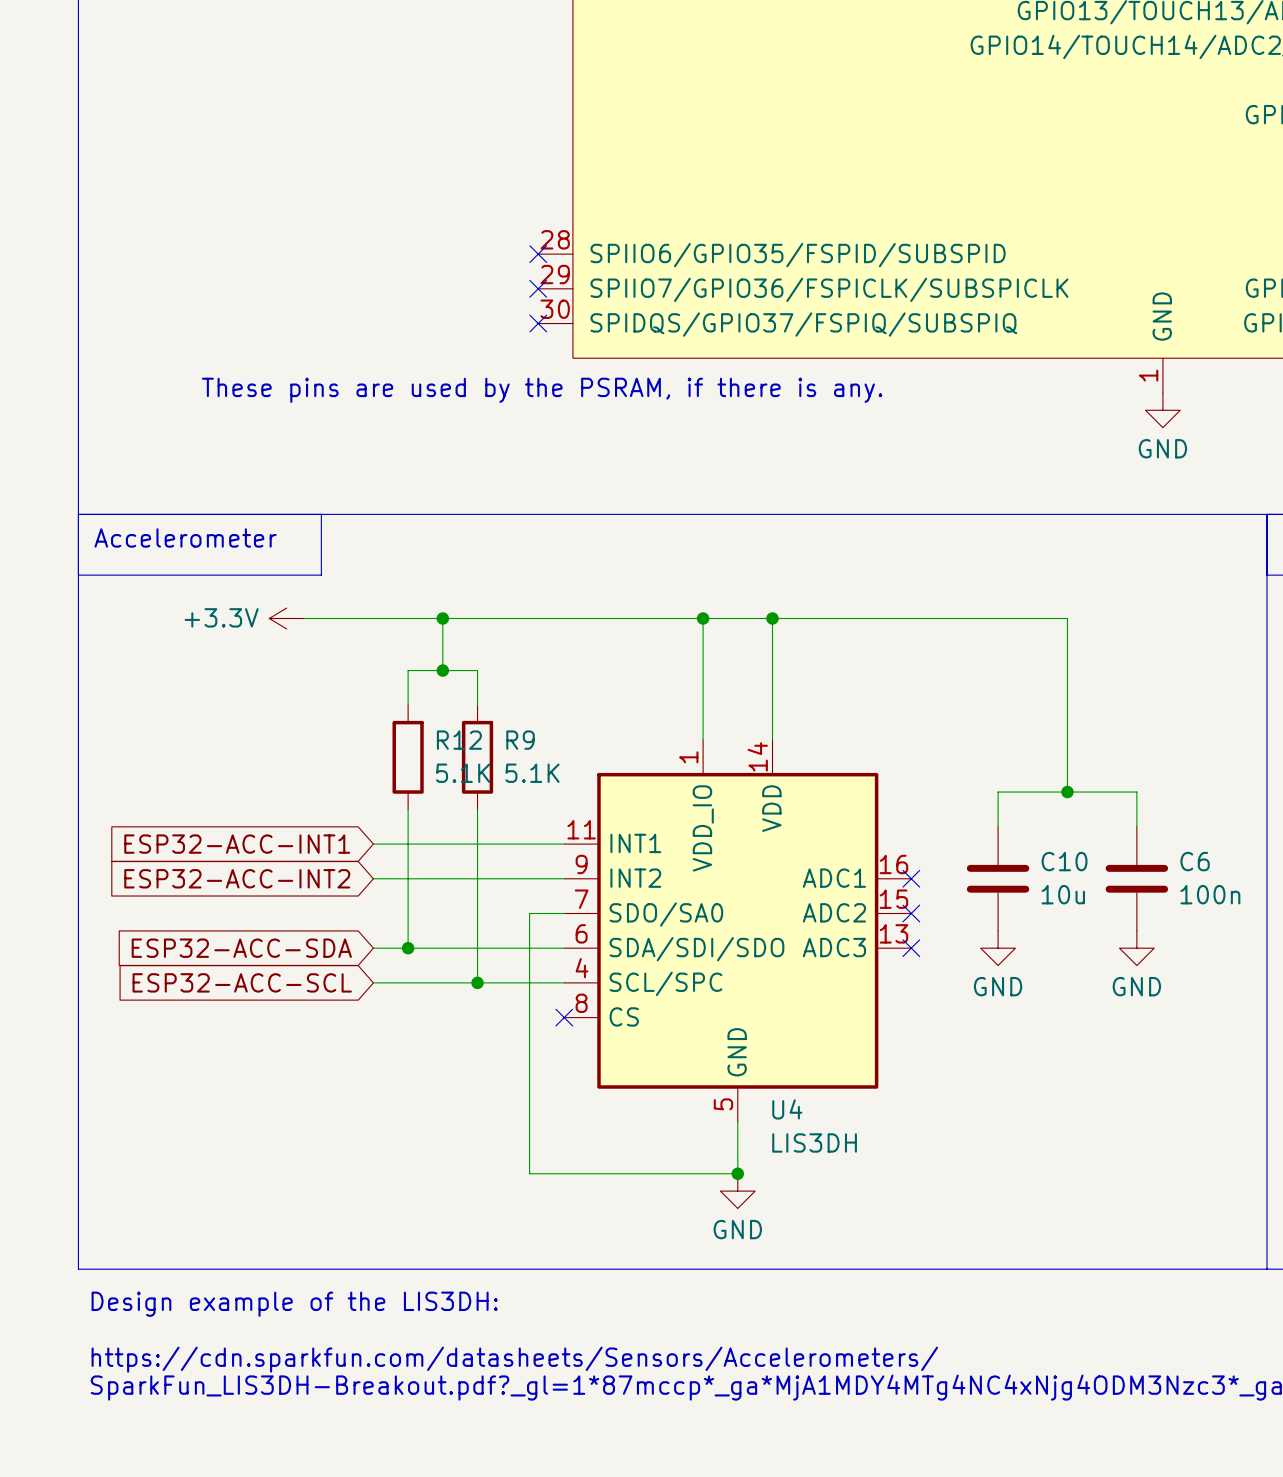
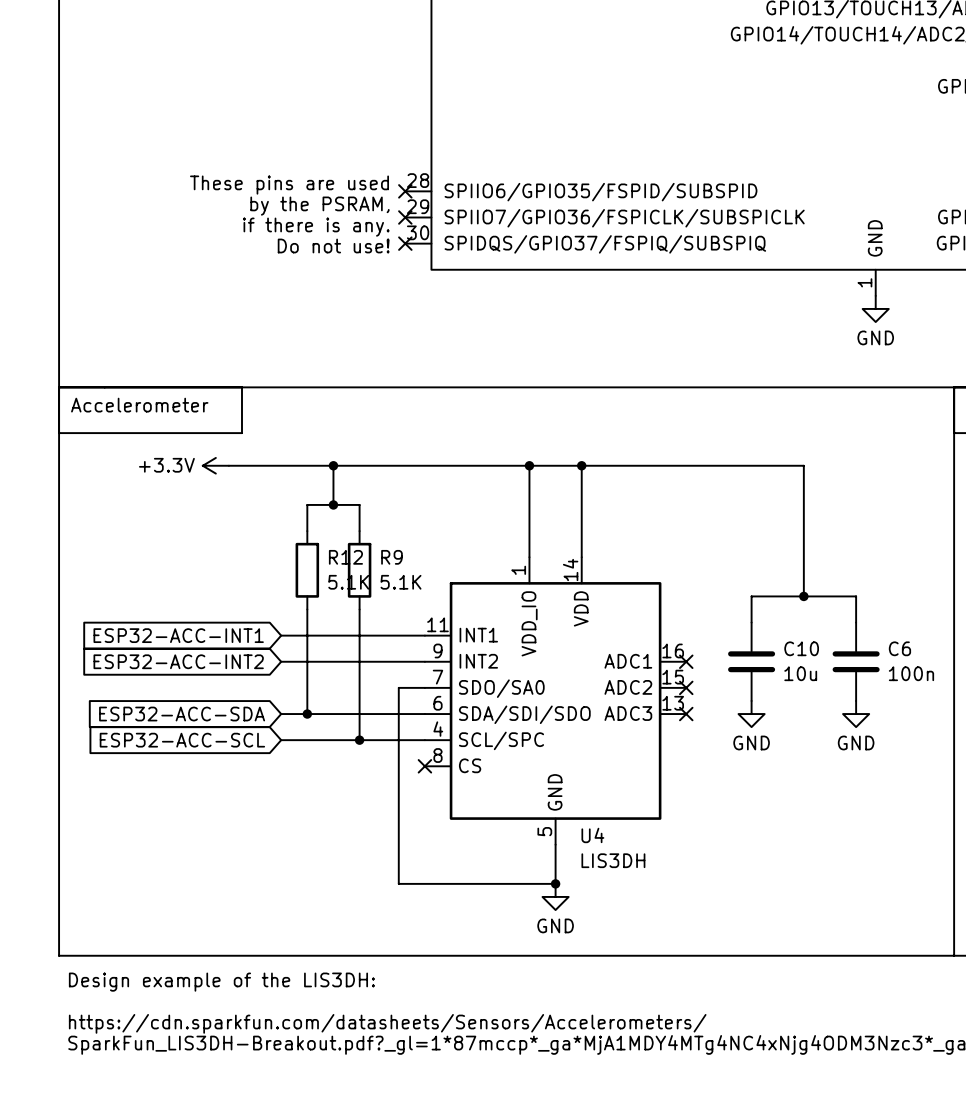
text: none -> These pins are used (289, 185)
text: none -> by the PSRAM, (319, 206)
text: none -> if there is any. (316, 227)
text: none -> Do not use! (333, 245)
text: These pins are used by the PSRAM, if there is any. (542, 390) -> none

